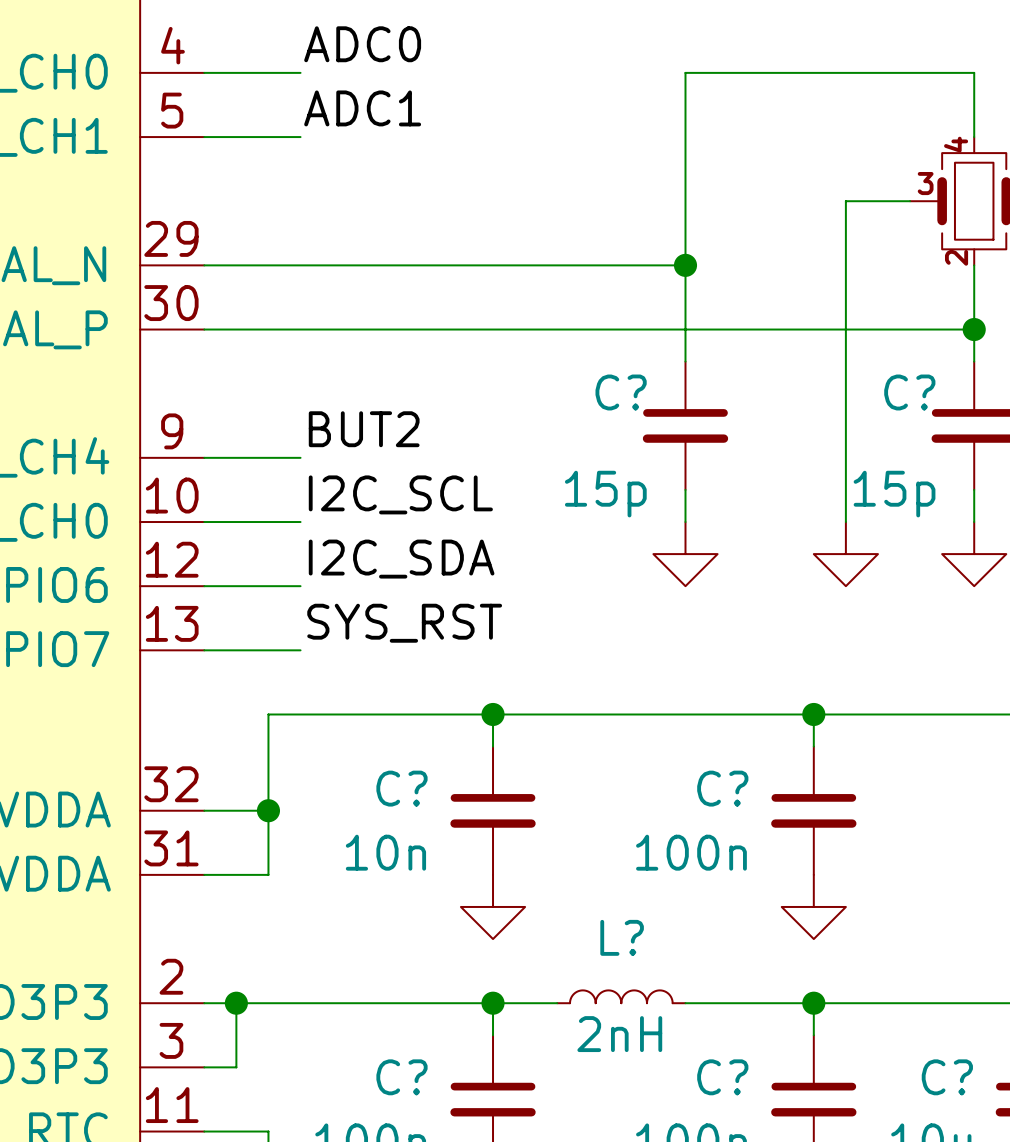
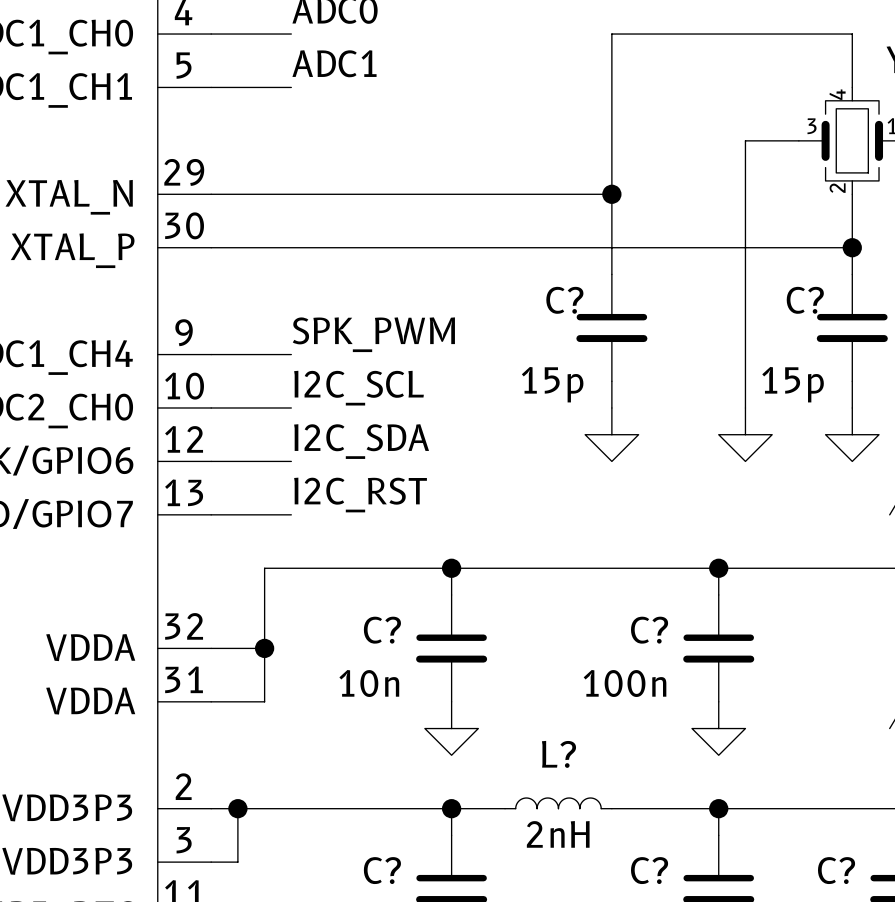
label: BUT2 (364, 429) -> SPK_PWM (373, 334)
label: SYS_RST (404, 623) -> I2C_RST (360, 495)

